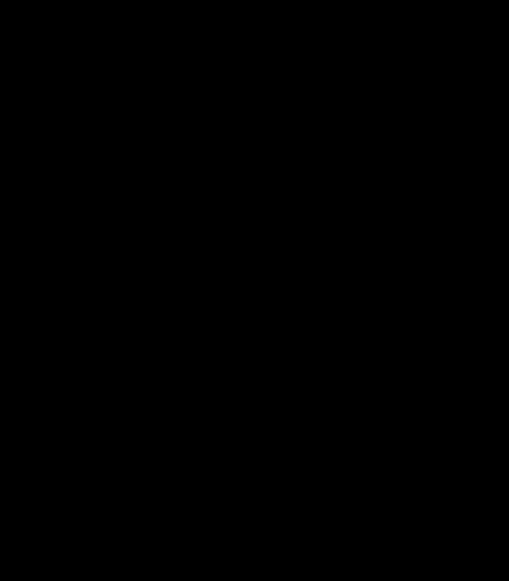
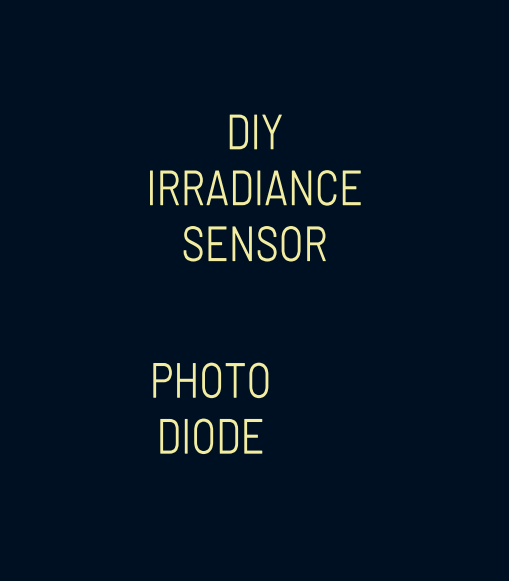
text: none -> DIY (255, 131)
text: none -> IRRADIANCE (255, 187)
text: none -> SENSOR (254, 243)
text: none -> PHOTO (210, 380)
text: none -> DIODE (211, 436)

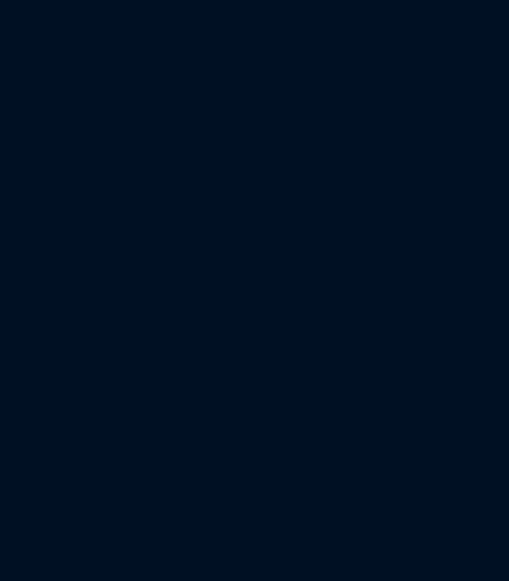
text: DIY (255, 131) -> none
text: IRRADIANCE (255, 187) -> none
text: SENSOR (254, 243) -> none
text: PHOTO (210, 380) -> none
text: DIODE (211, 436) -> none

